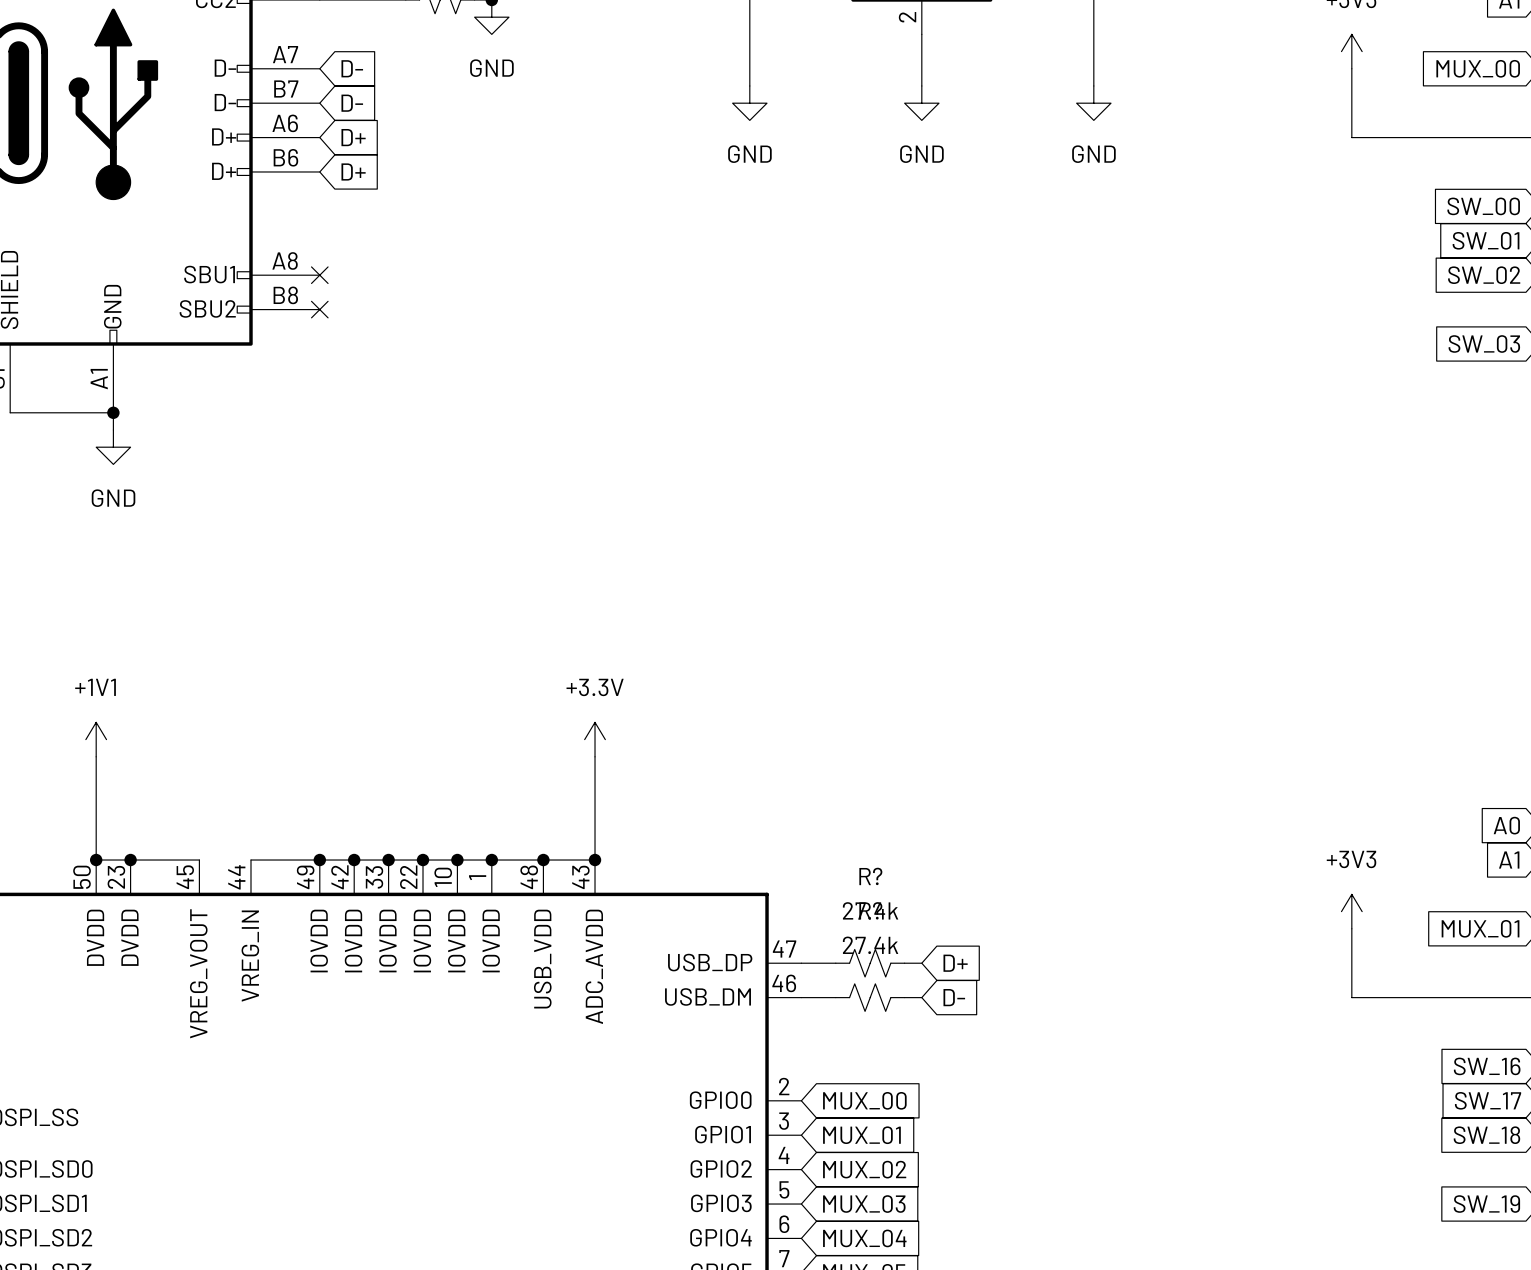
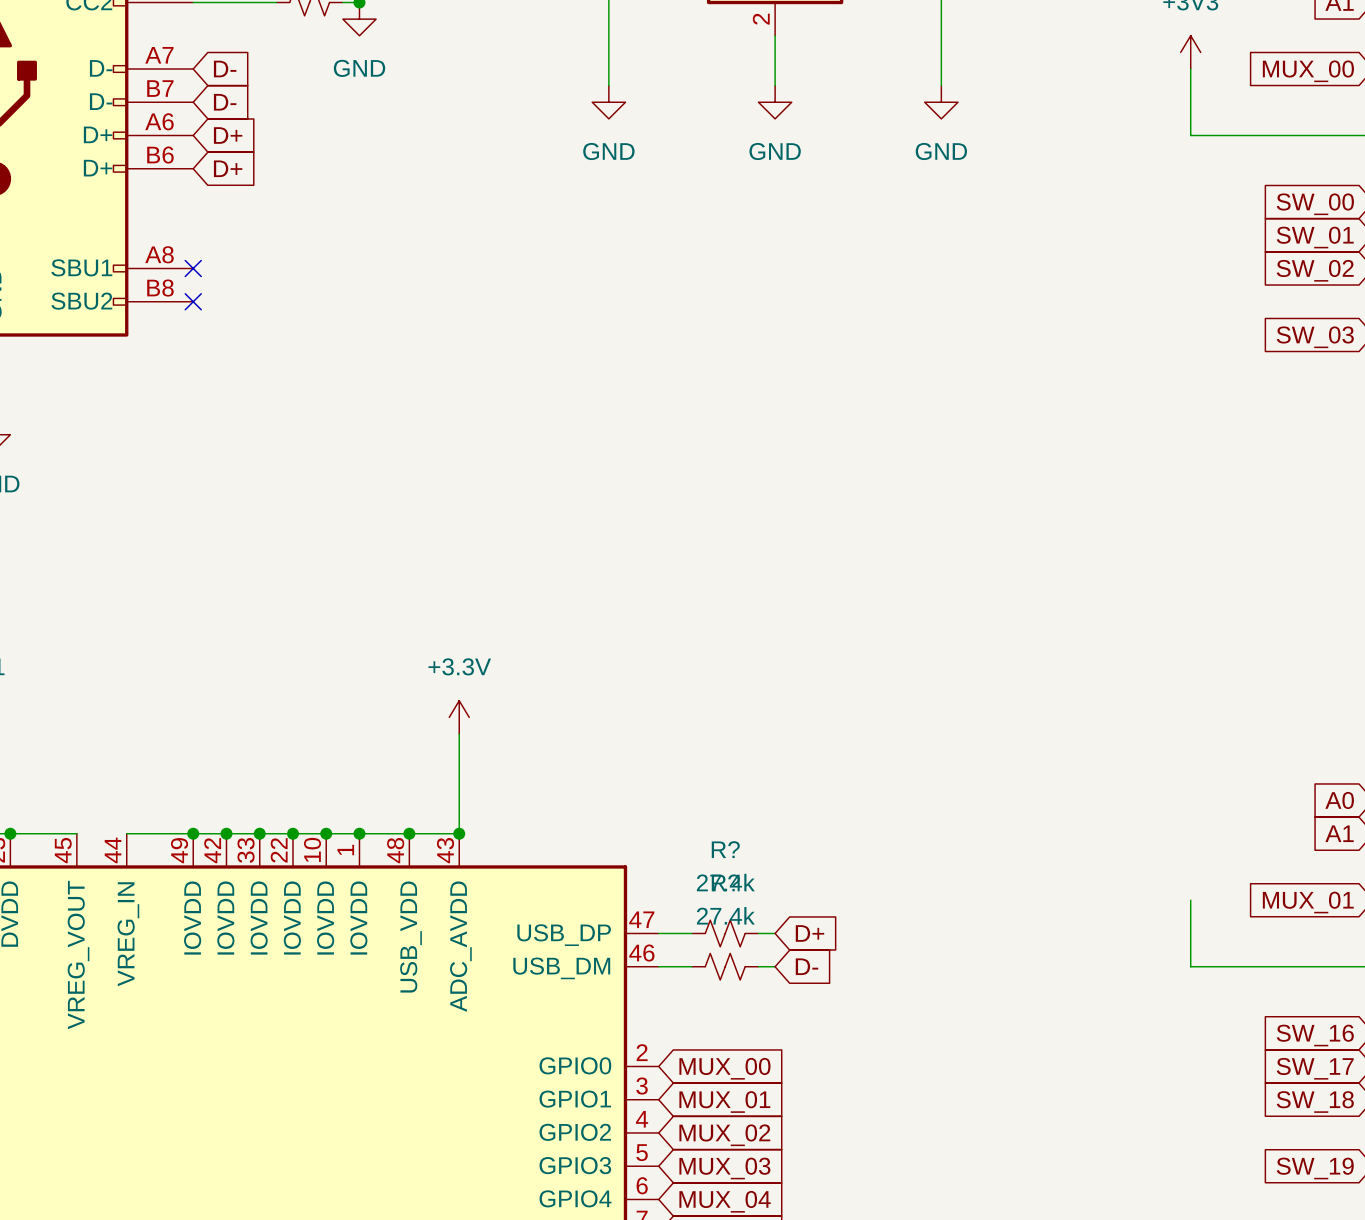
power symbol: +3V3 (1351, 911) -> none

